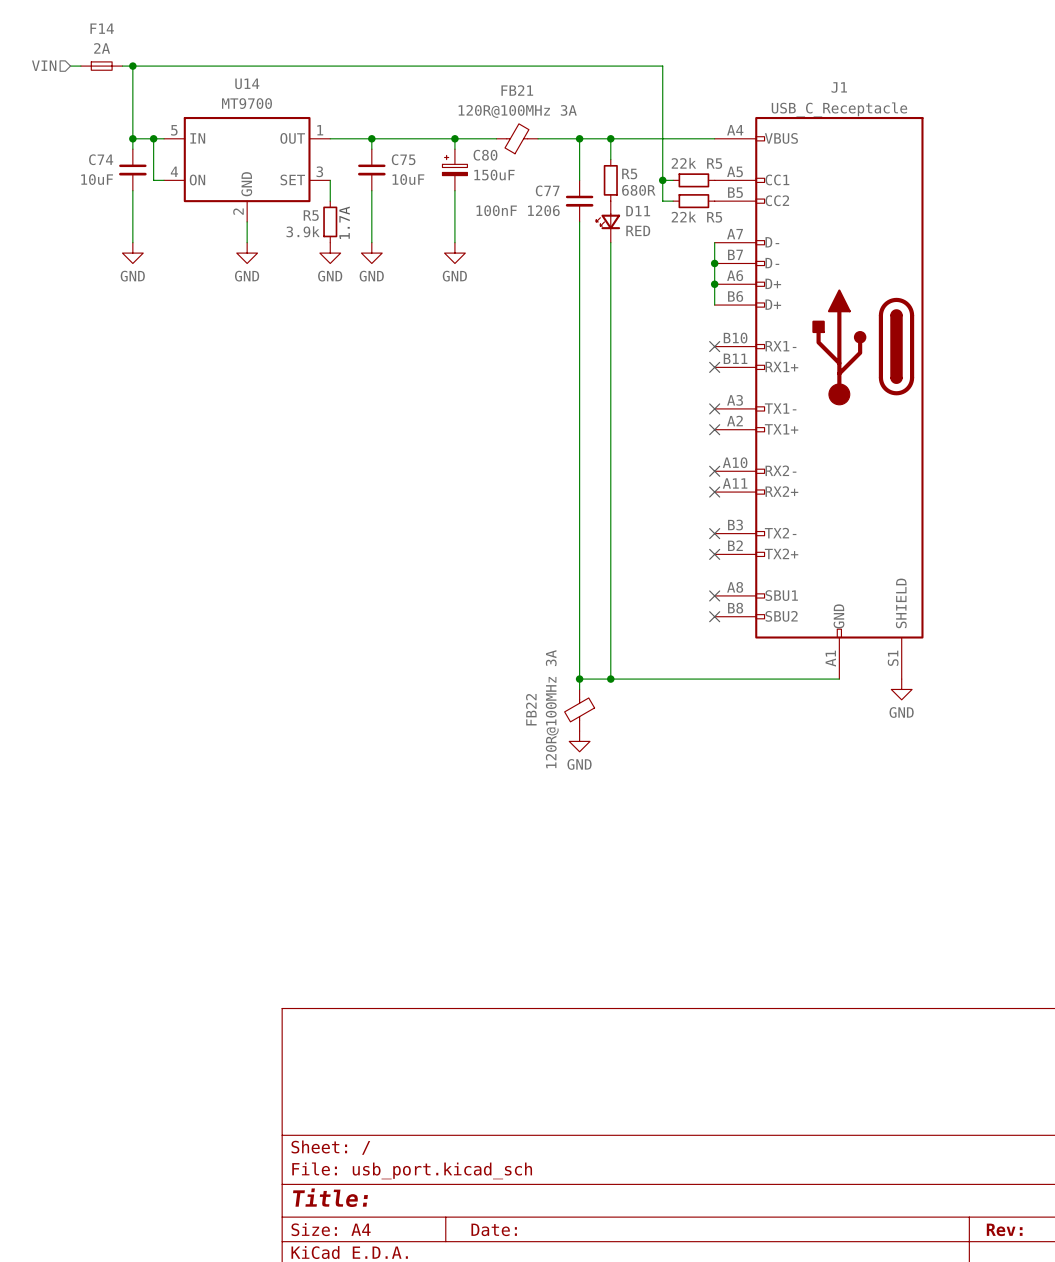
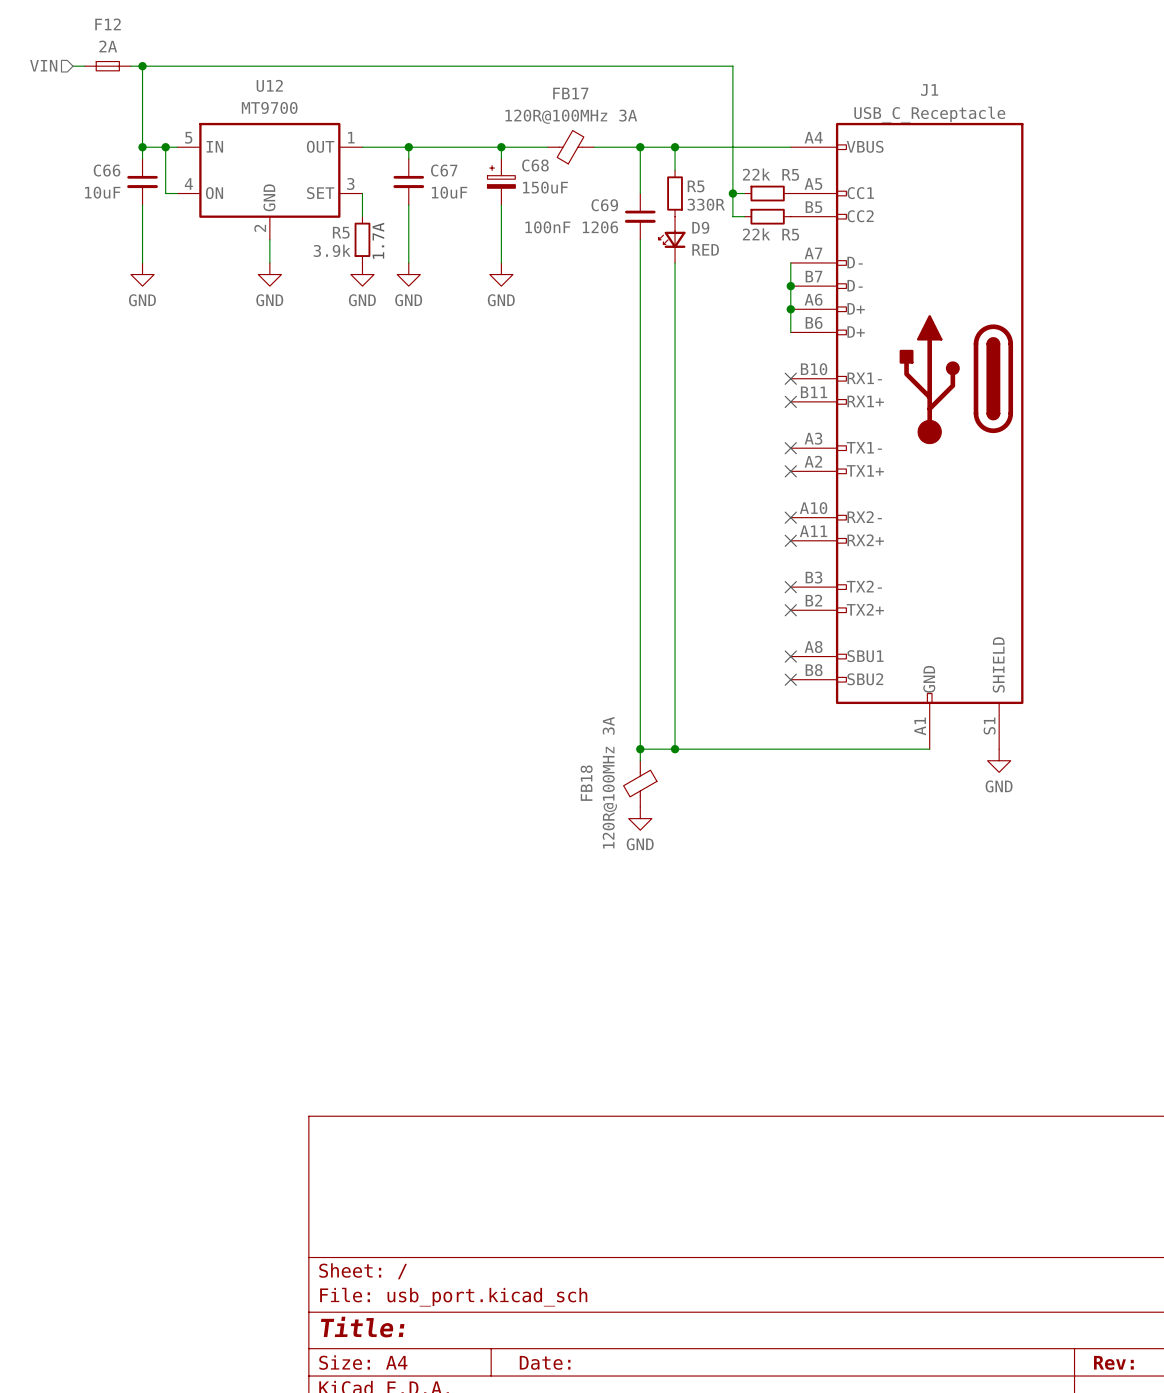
F14 name: F14 (102, 28) -> F12 (108, 24)
U14 name: U14 (247, 83) -> U12 (269, 85)
FB21 name: FB21 (517, 90) -> FB17 (570, 93)
C80 name: C80 (485, 155) -> C68 (535, 165)
C74 name: C74 (101, 159) -> C66 (107, 170)
C75 name: C75 (403, 159) -> C67 (444, 170)
C77 name: C77 (547, 190) -> C69 (604, 205)
R5 value: 680R (638, 190) -> 330R (706, 204)
D11 name: D11 (638, 211) -> D9 (700, 227)
FB22 name: FB22 (531, 709) -> FB18 (586, 783)

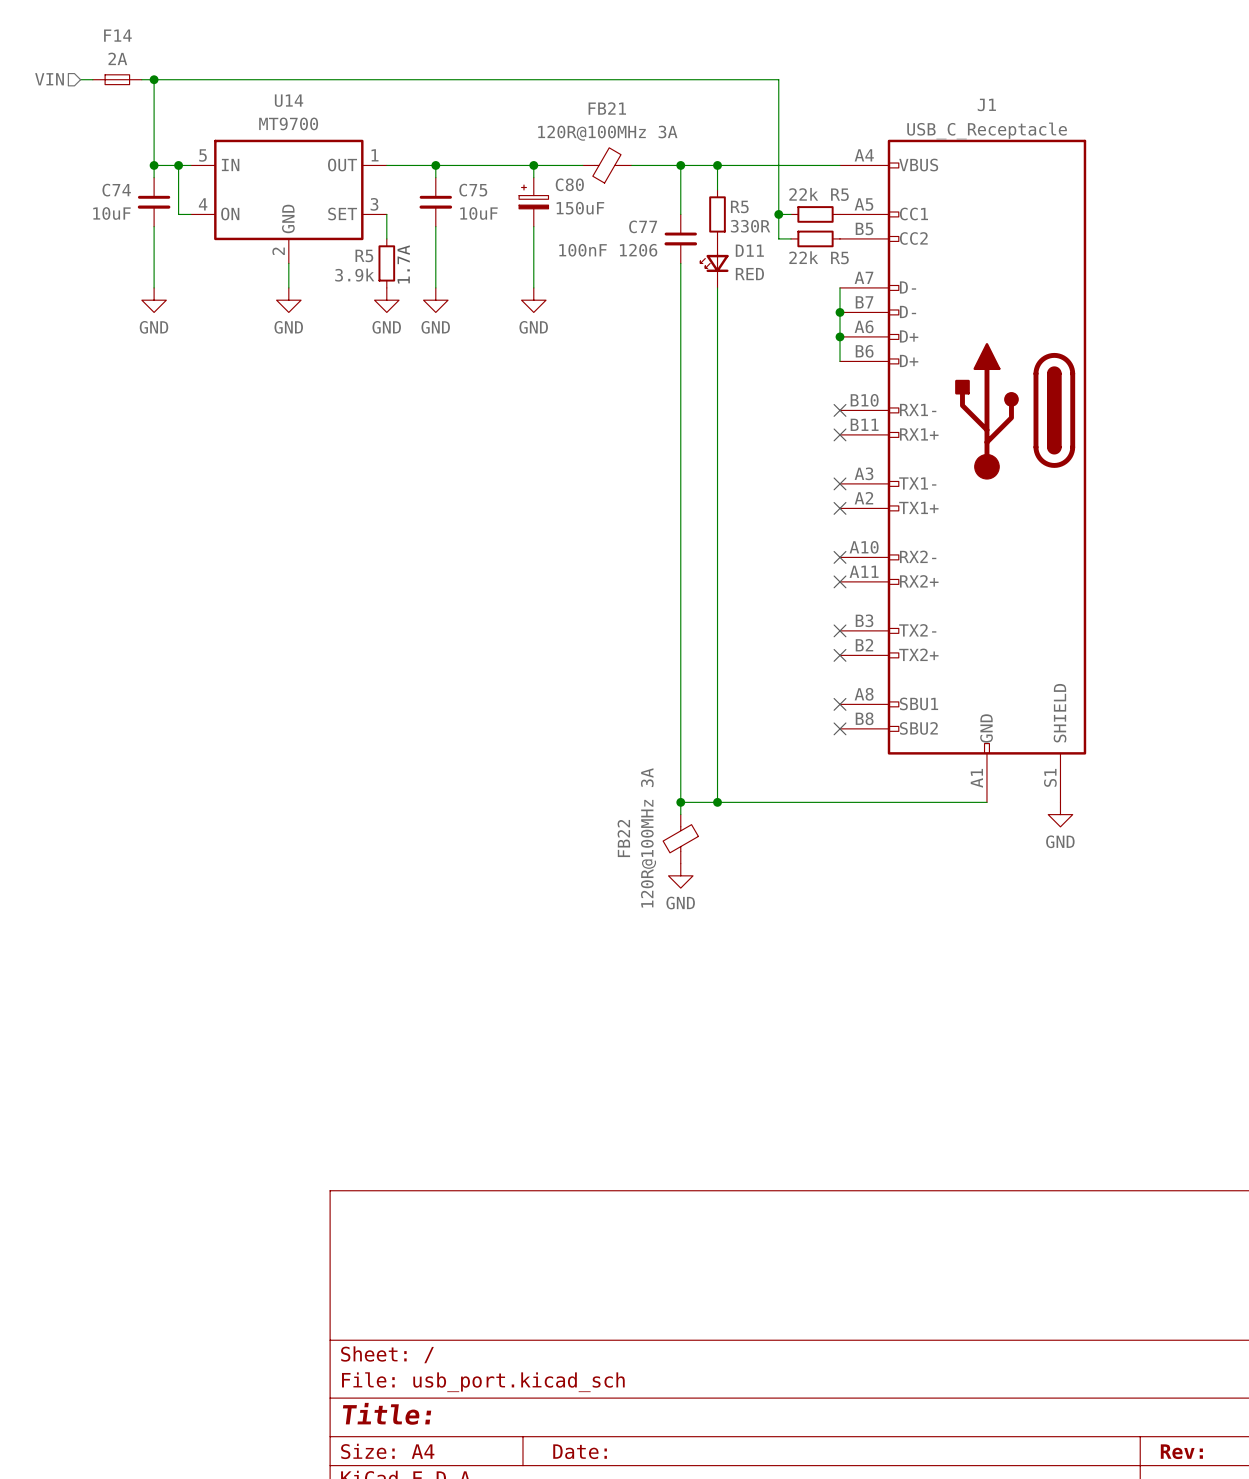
F12 name: F12 (108, 24) -> F14 (117, 35)
U12 name: U12 (269, 85) -> U14 (289, 100)
FB17 name: FB17 (570, 93) -> FB21 (607, 108)
C68 name: C68 (535, 165) -> C80 (569, 184)
C66 name: C66 (107, 170) -> C74 (116, 190)
C67 name: C67 (444, 170) -> C75 (473, 190)
C69 name: C69 (604, 205) -> C77 (643, 226)
D9 name: D9 (700, 227) -> D11 (749, 250)
FB18 name: FB18 (586, 783) -> FB22 (623, 838)

